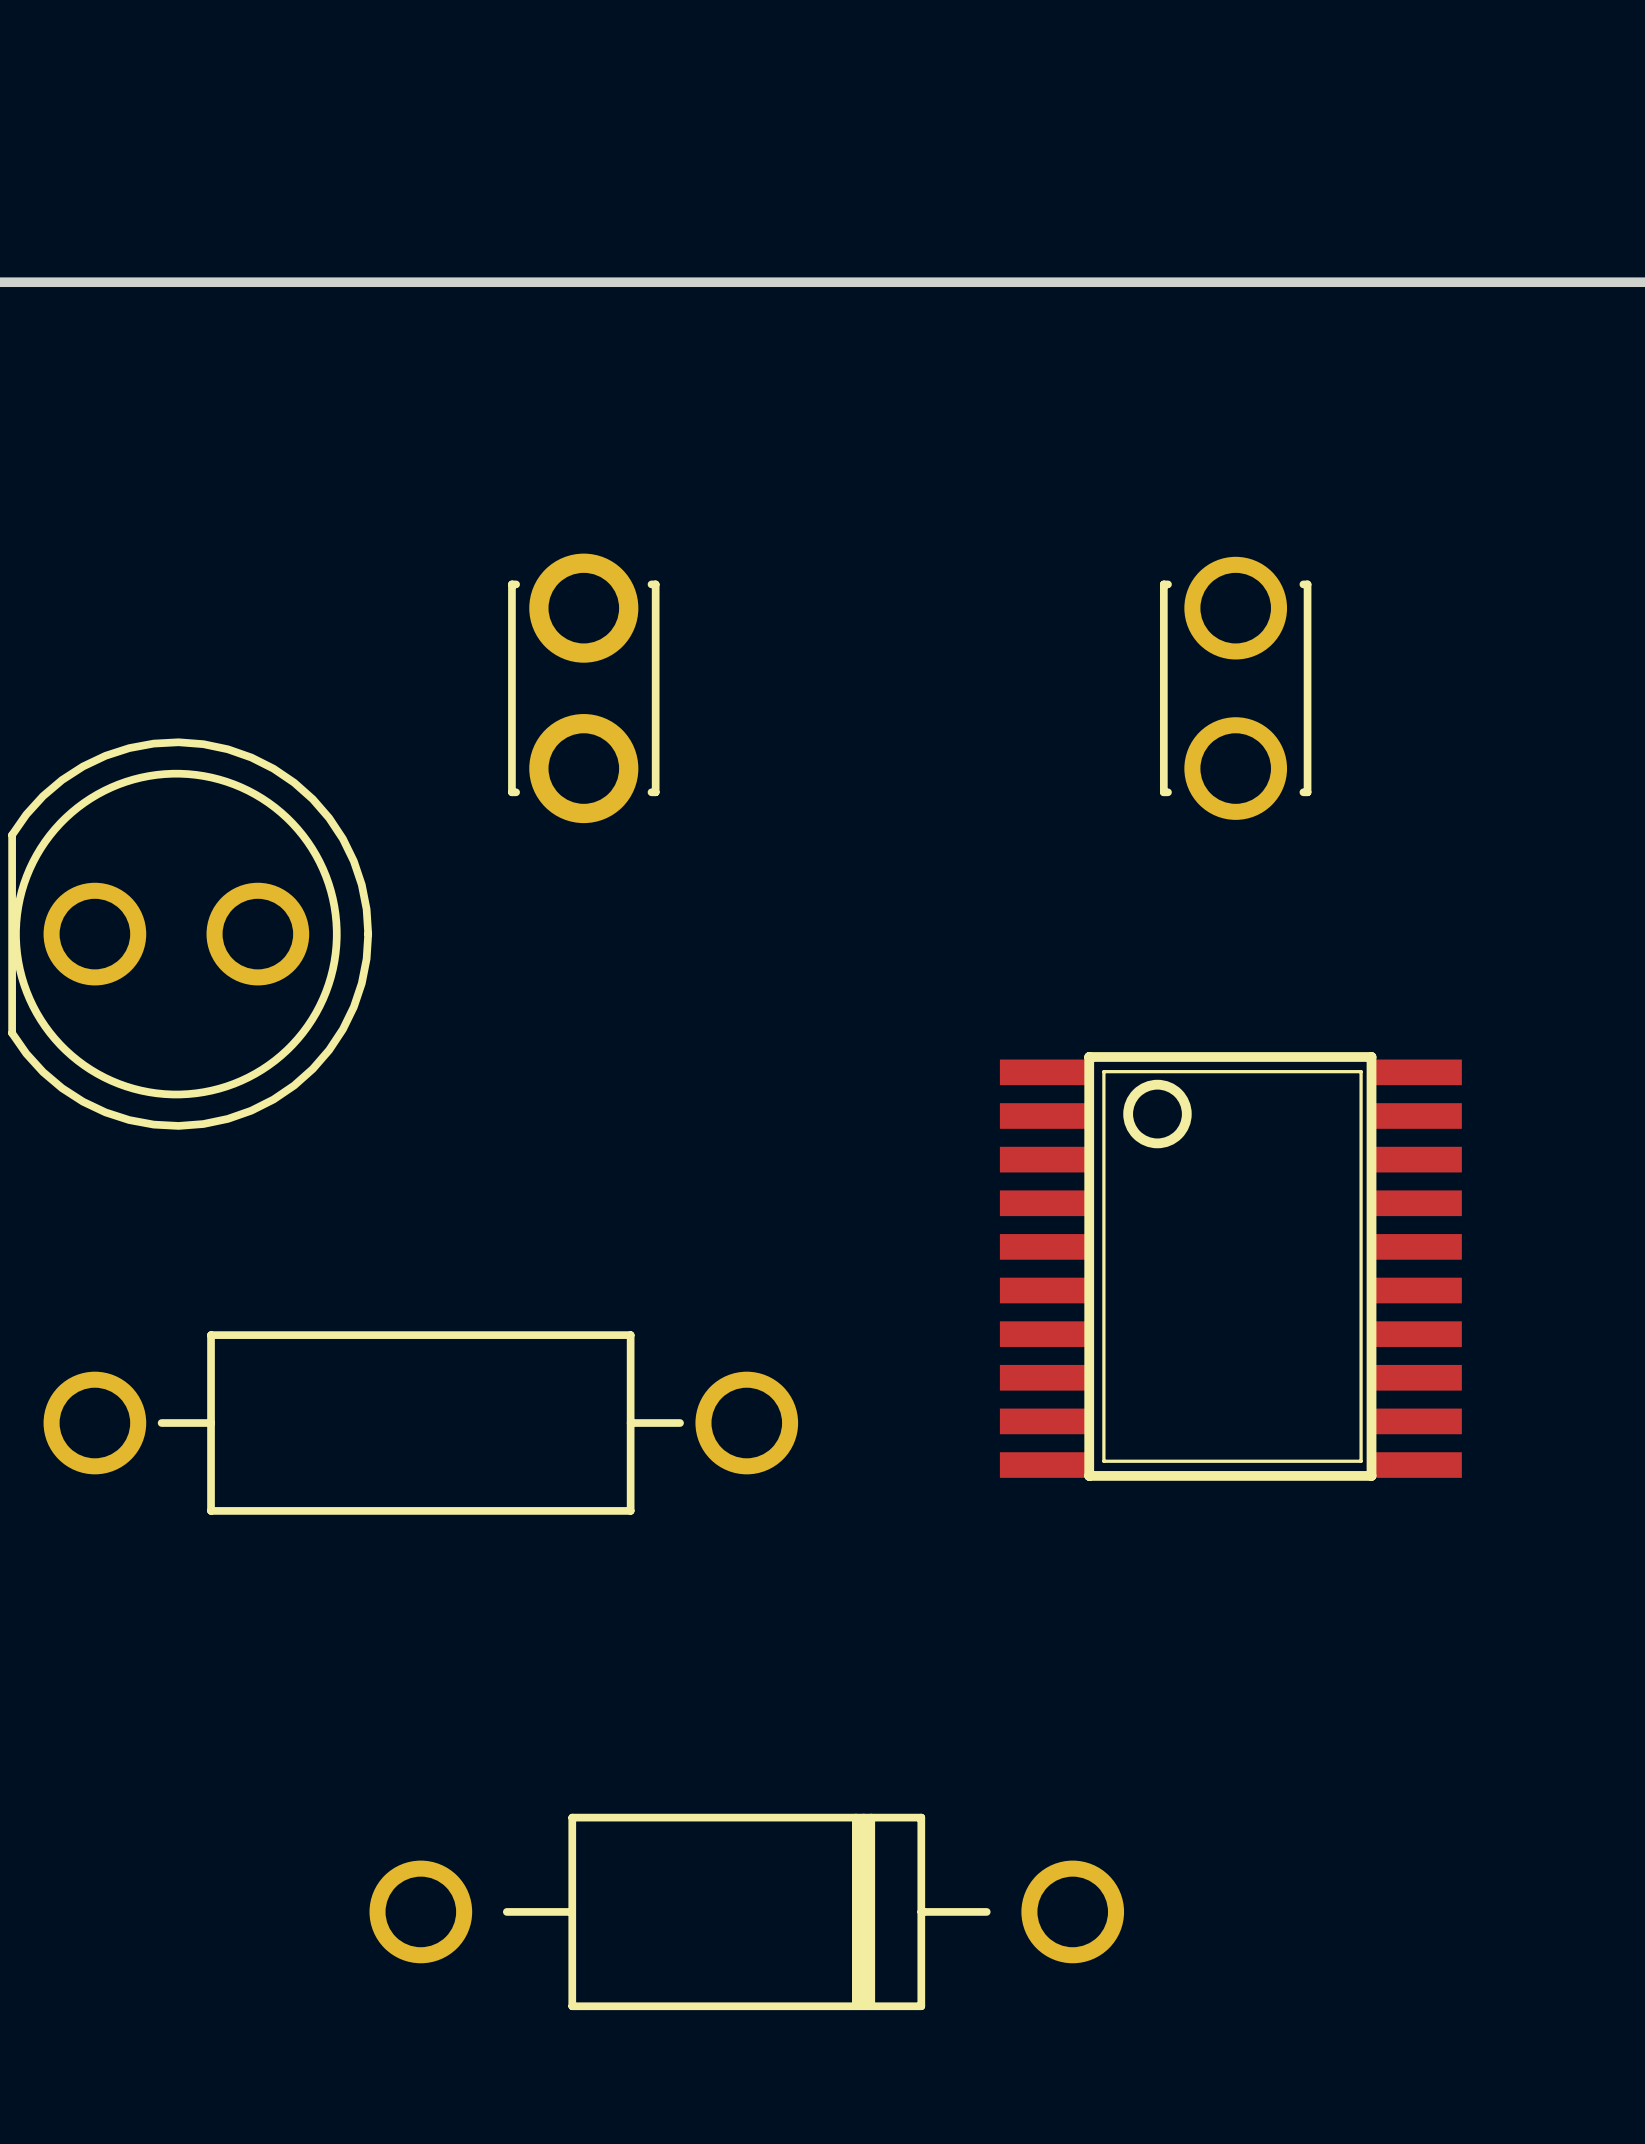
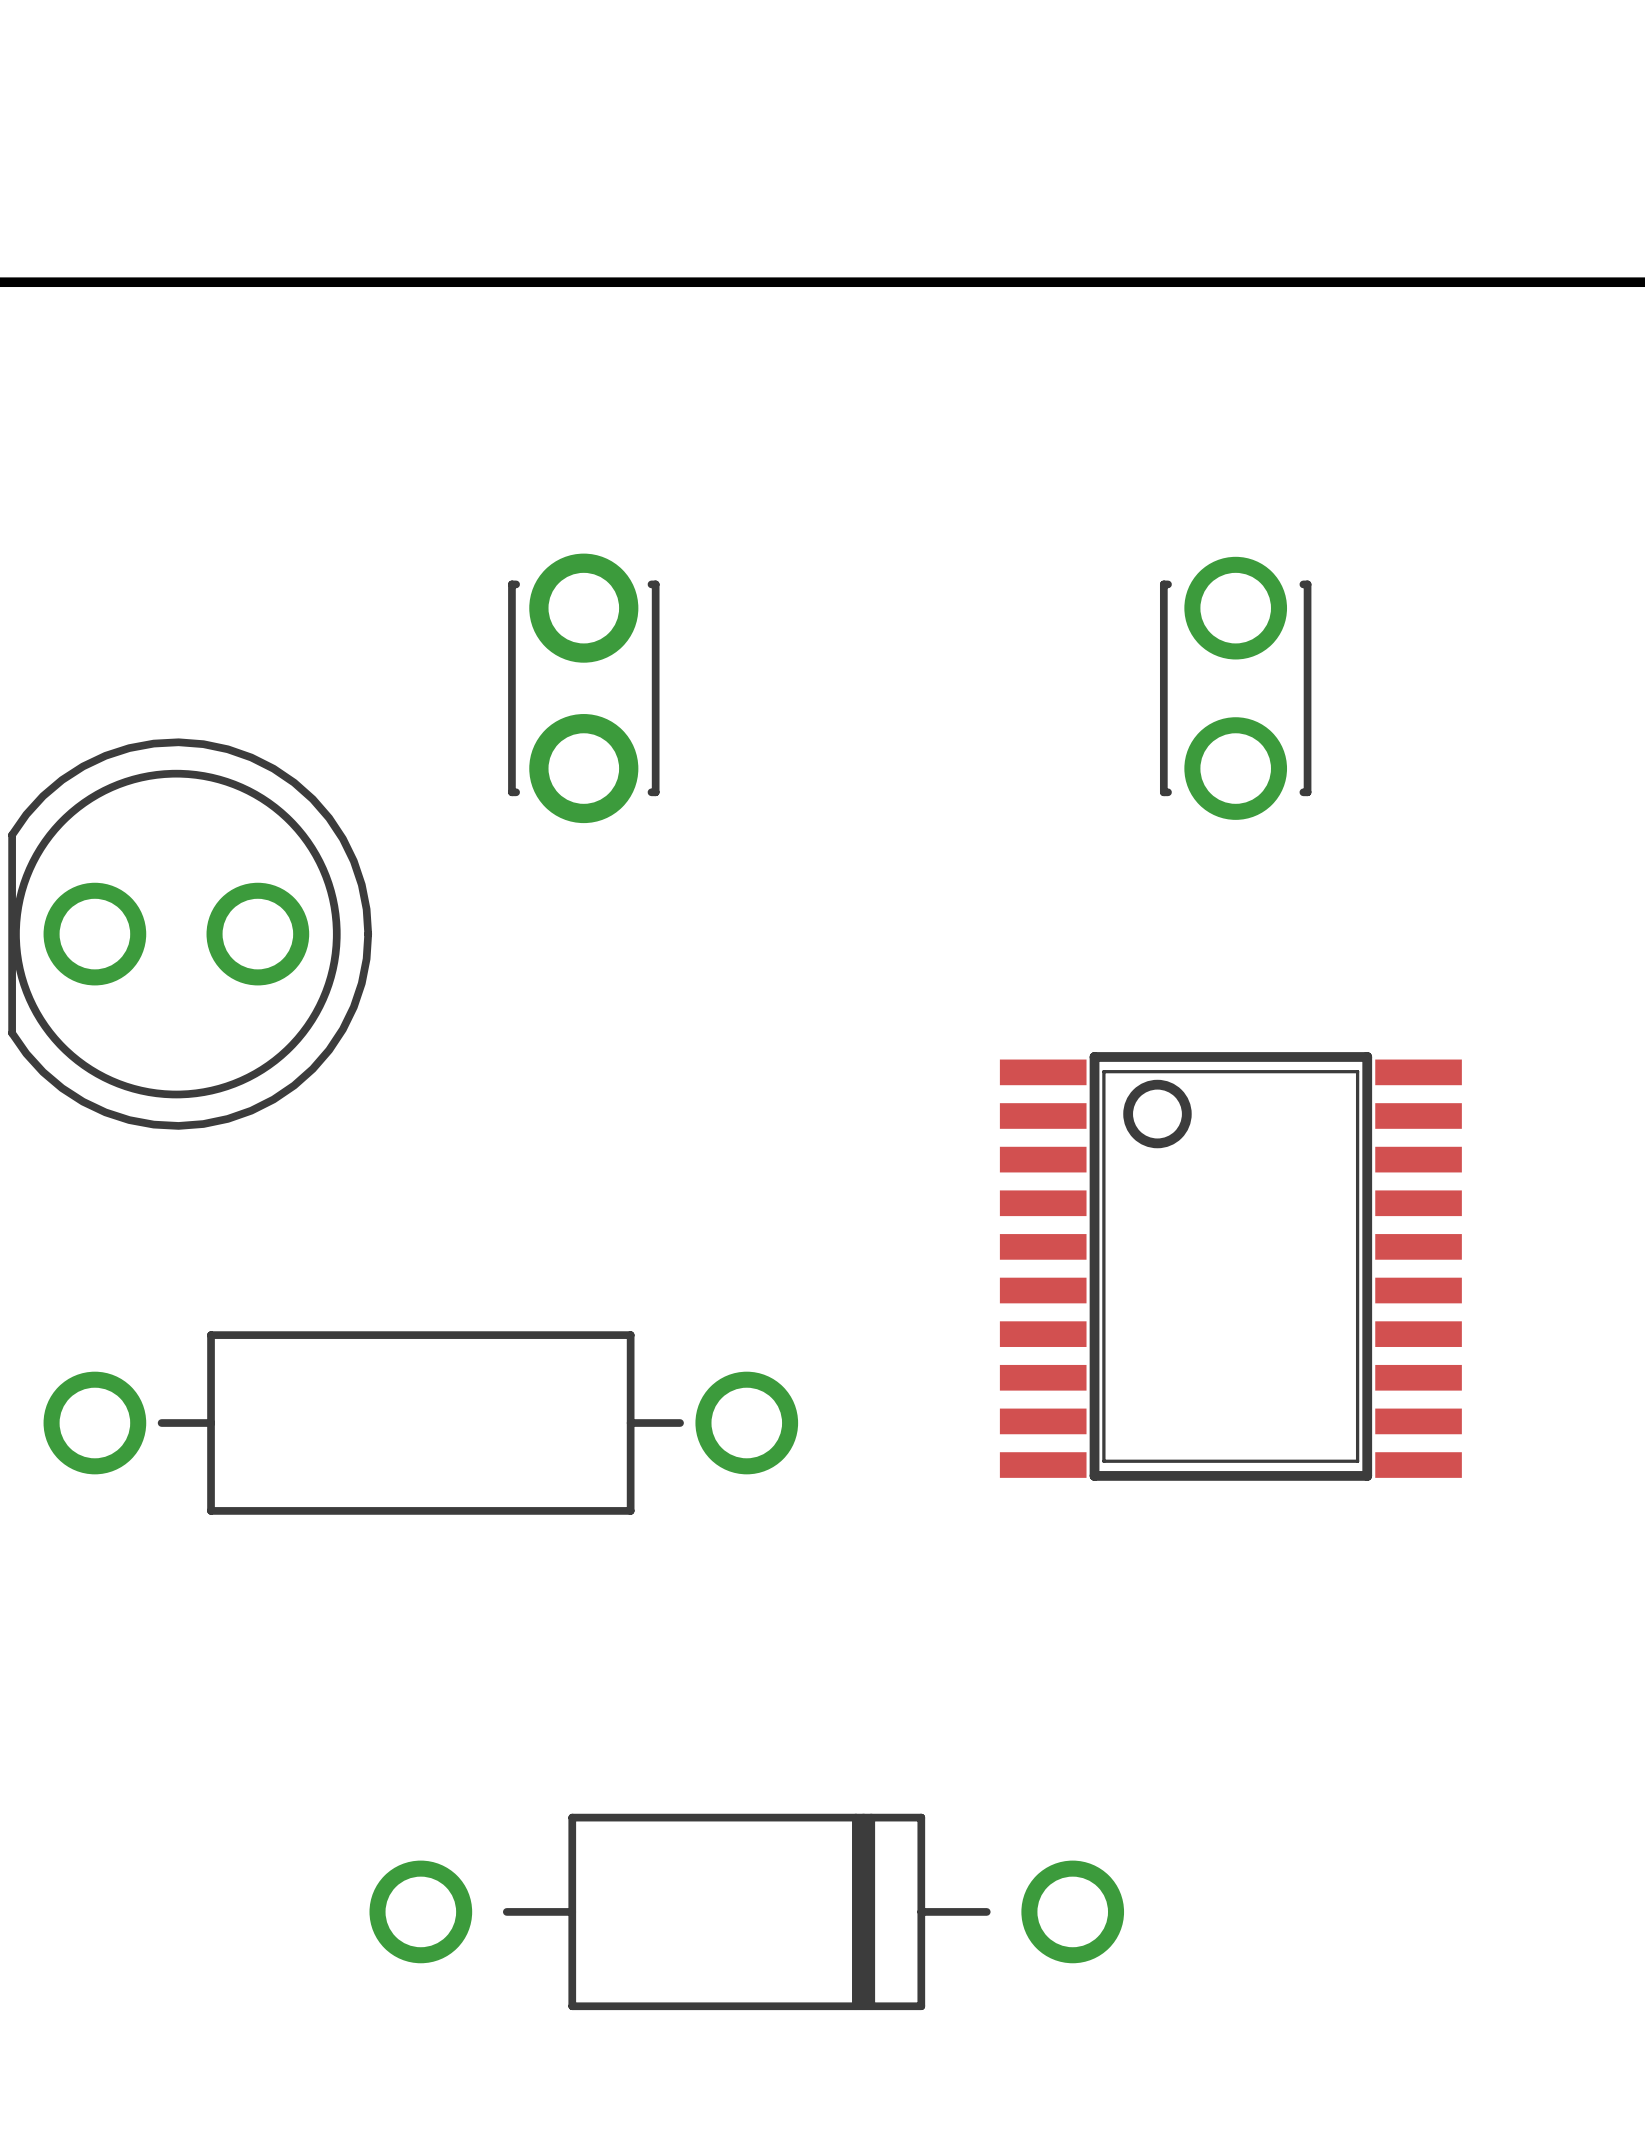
part footprint: [999, 1052, 1462, 1481] -> [999, 1052, 1462, 1481]

